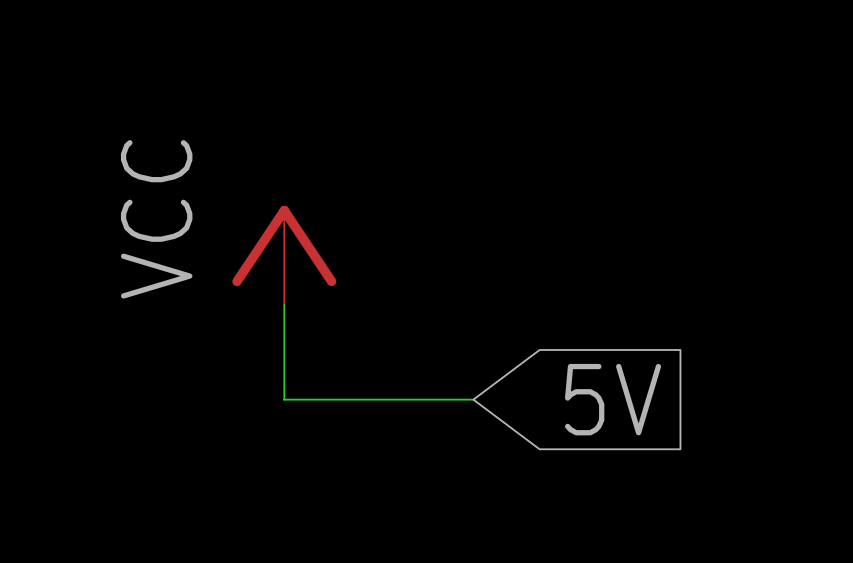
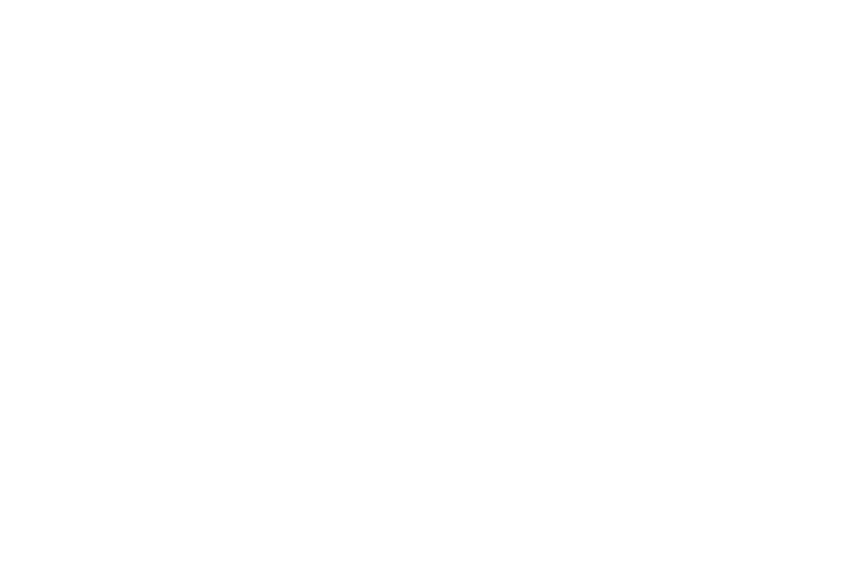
power symbol: VCC (284, 255) -> none
wire: (284, 305) (284, 399) (473, 399) -> none
global label: 5V (613, 399) -> none

